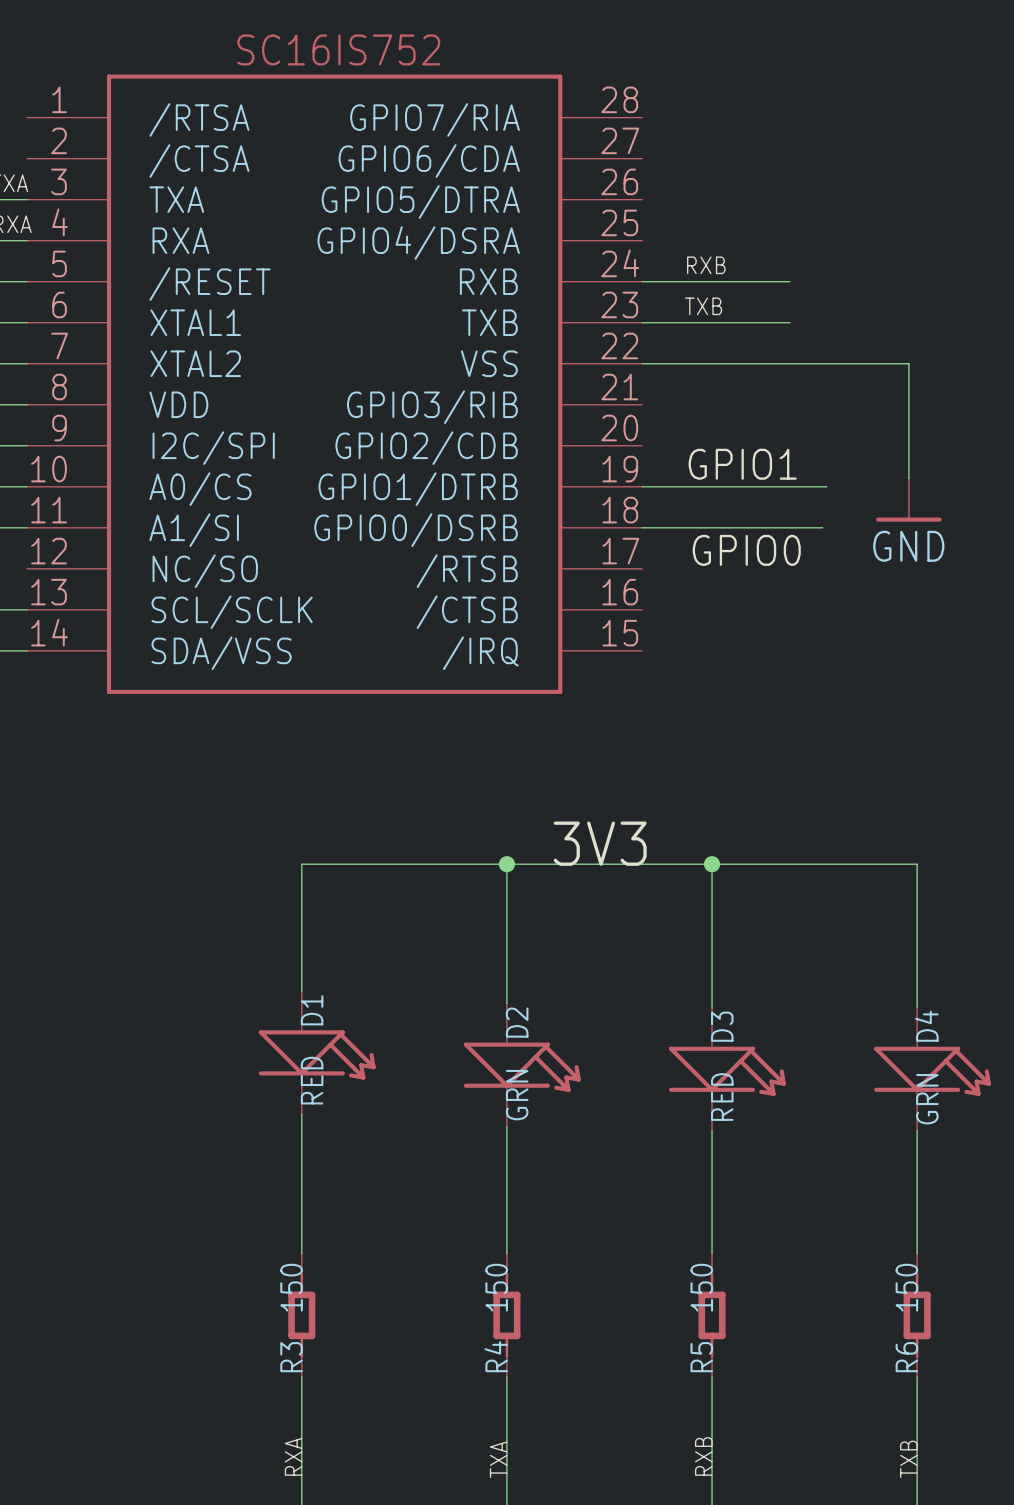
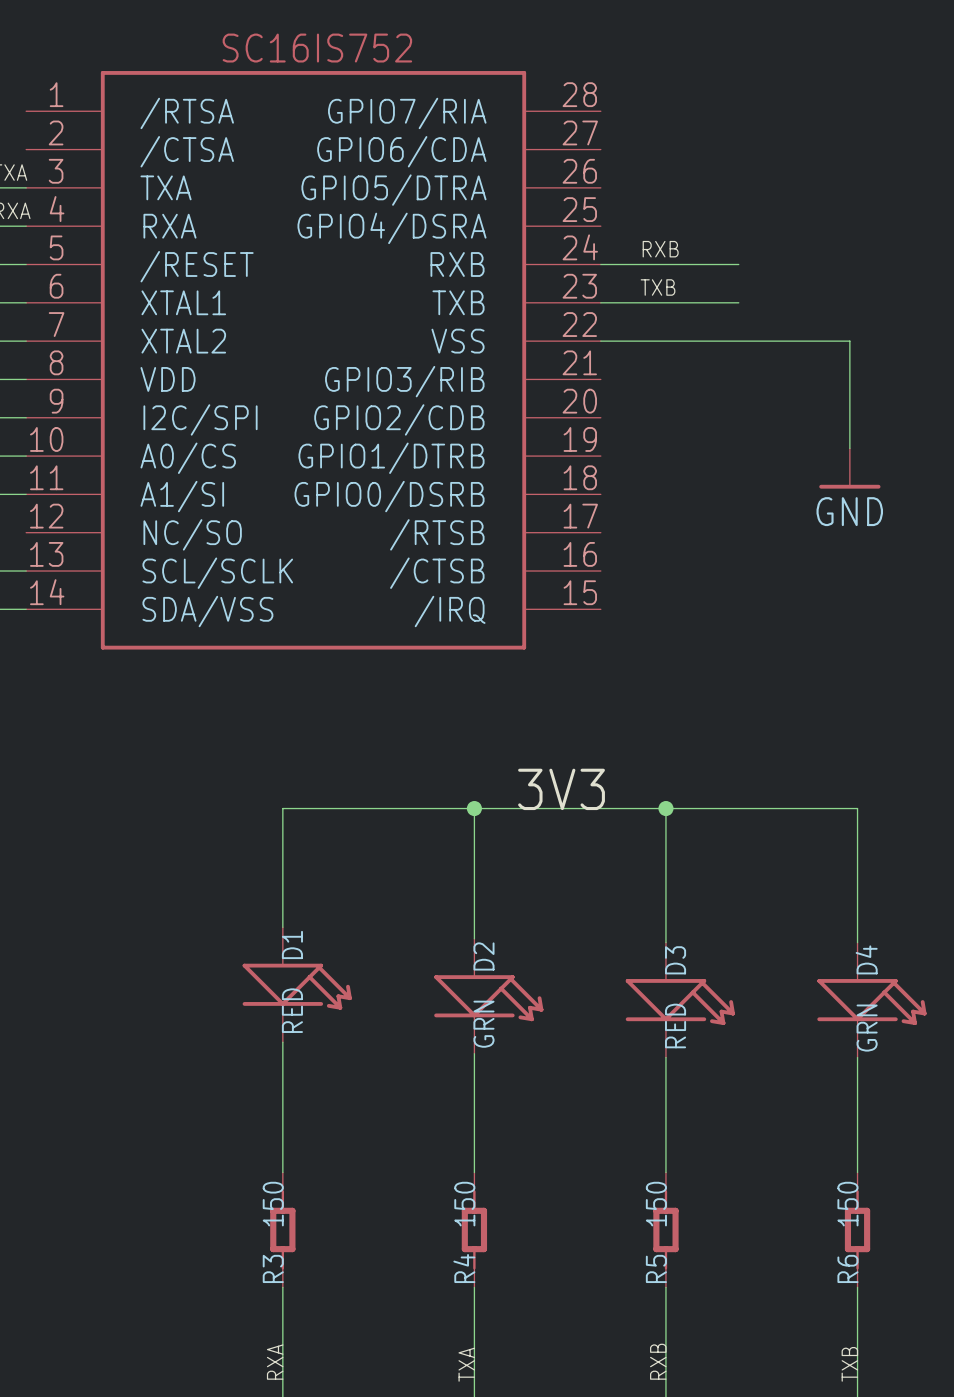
label: GPIO1 (742, 464) -> none
wire: (642, 486) (826, 486) -> none
wire: (642, 527) (822, 527) -> none
label: GPIO0 (746, 550) -> none

